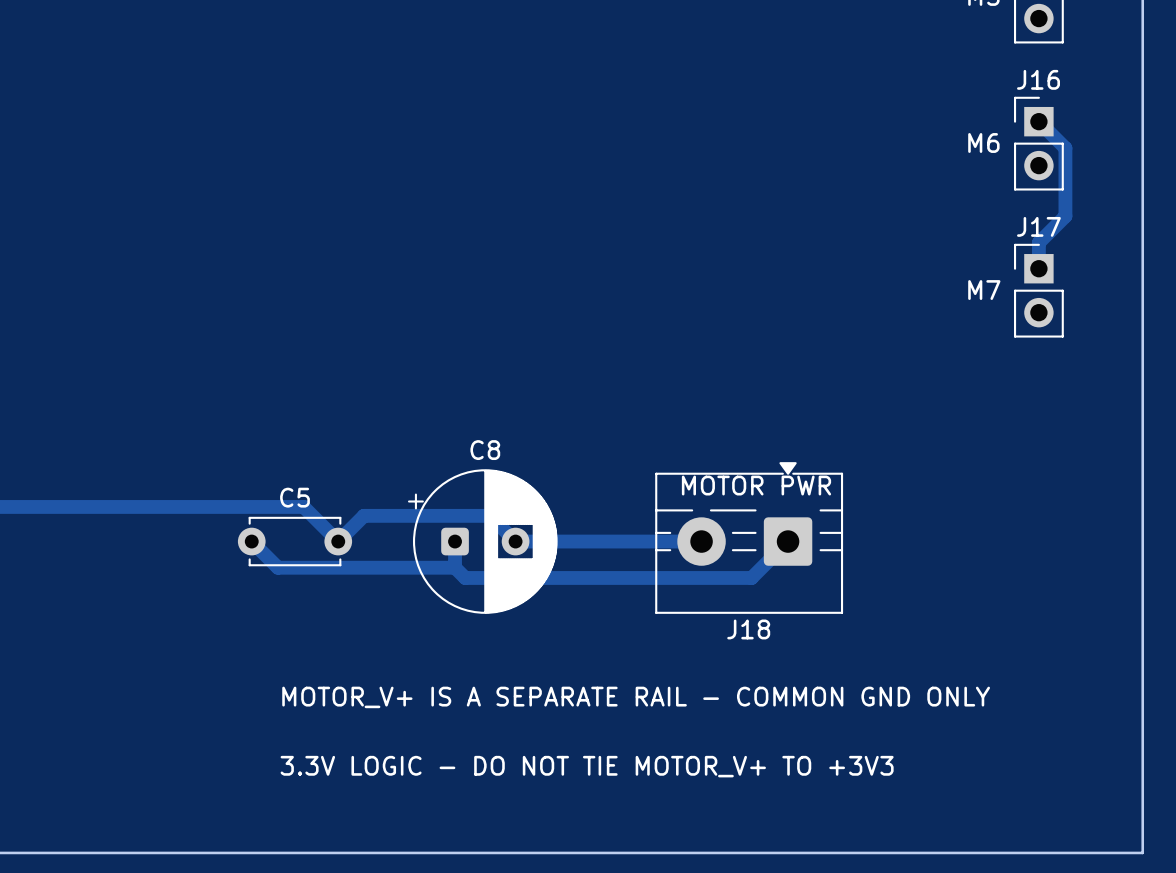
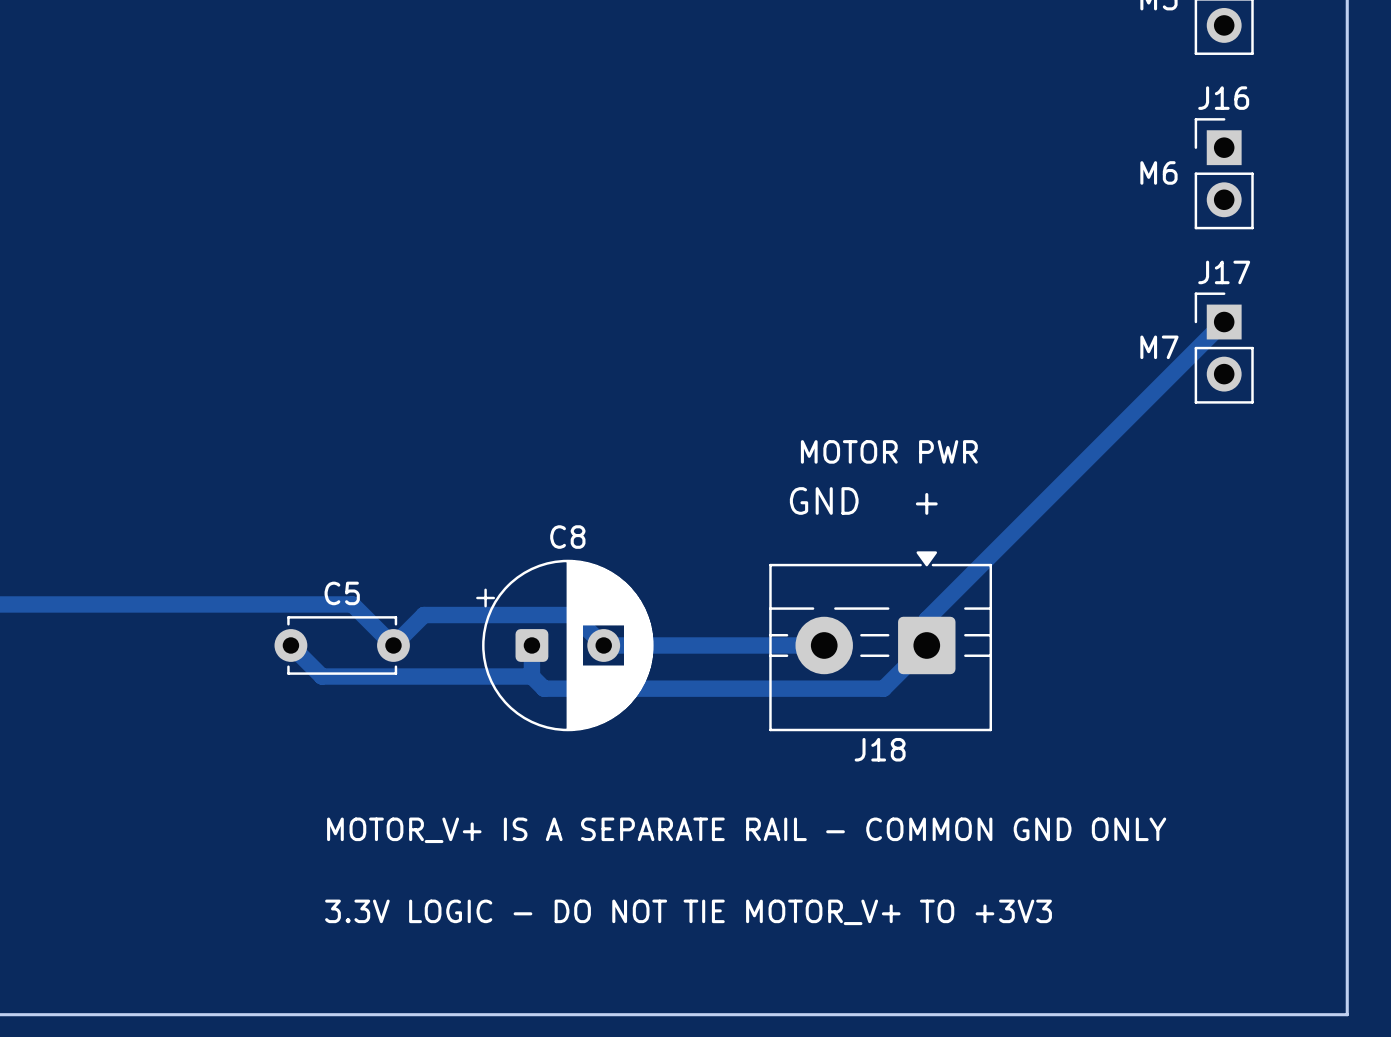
track: (1038, 121) (1065, 148) (1065, 216) (1038, 242) (1038, 268) -> (926, 645) (926, 619) (1224, 322)
text: none -> GND (824, 500)
text: none -> + (926, 503)
text position: MOTOR PWR (756, 485) -> MOTOR PWR (889, 451)

